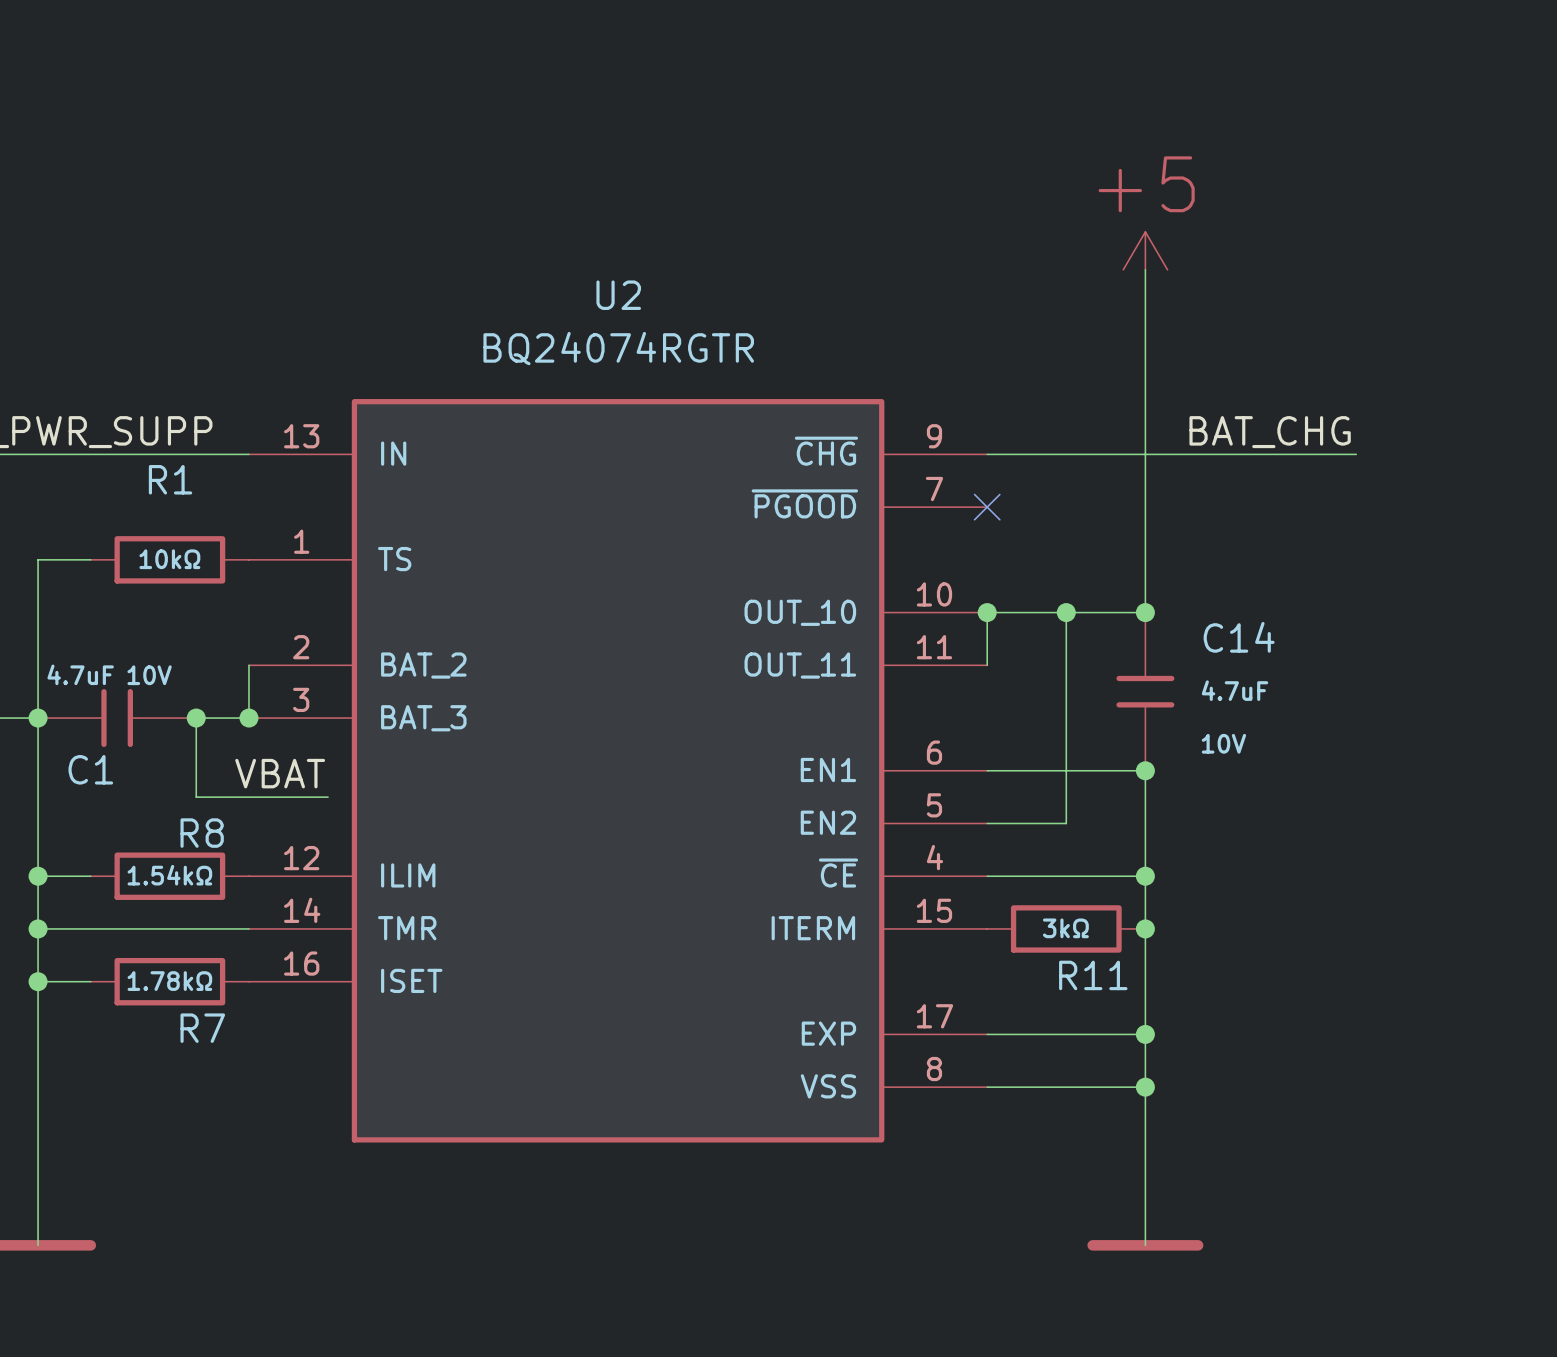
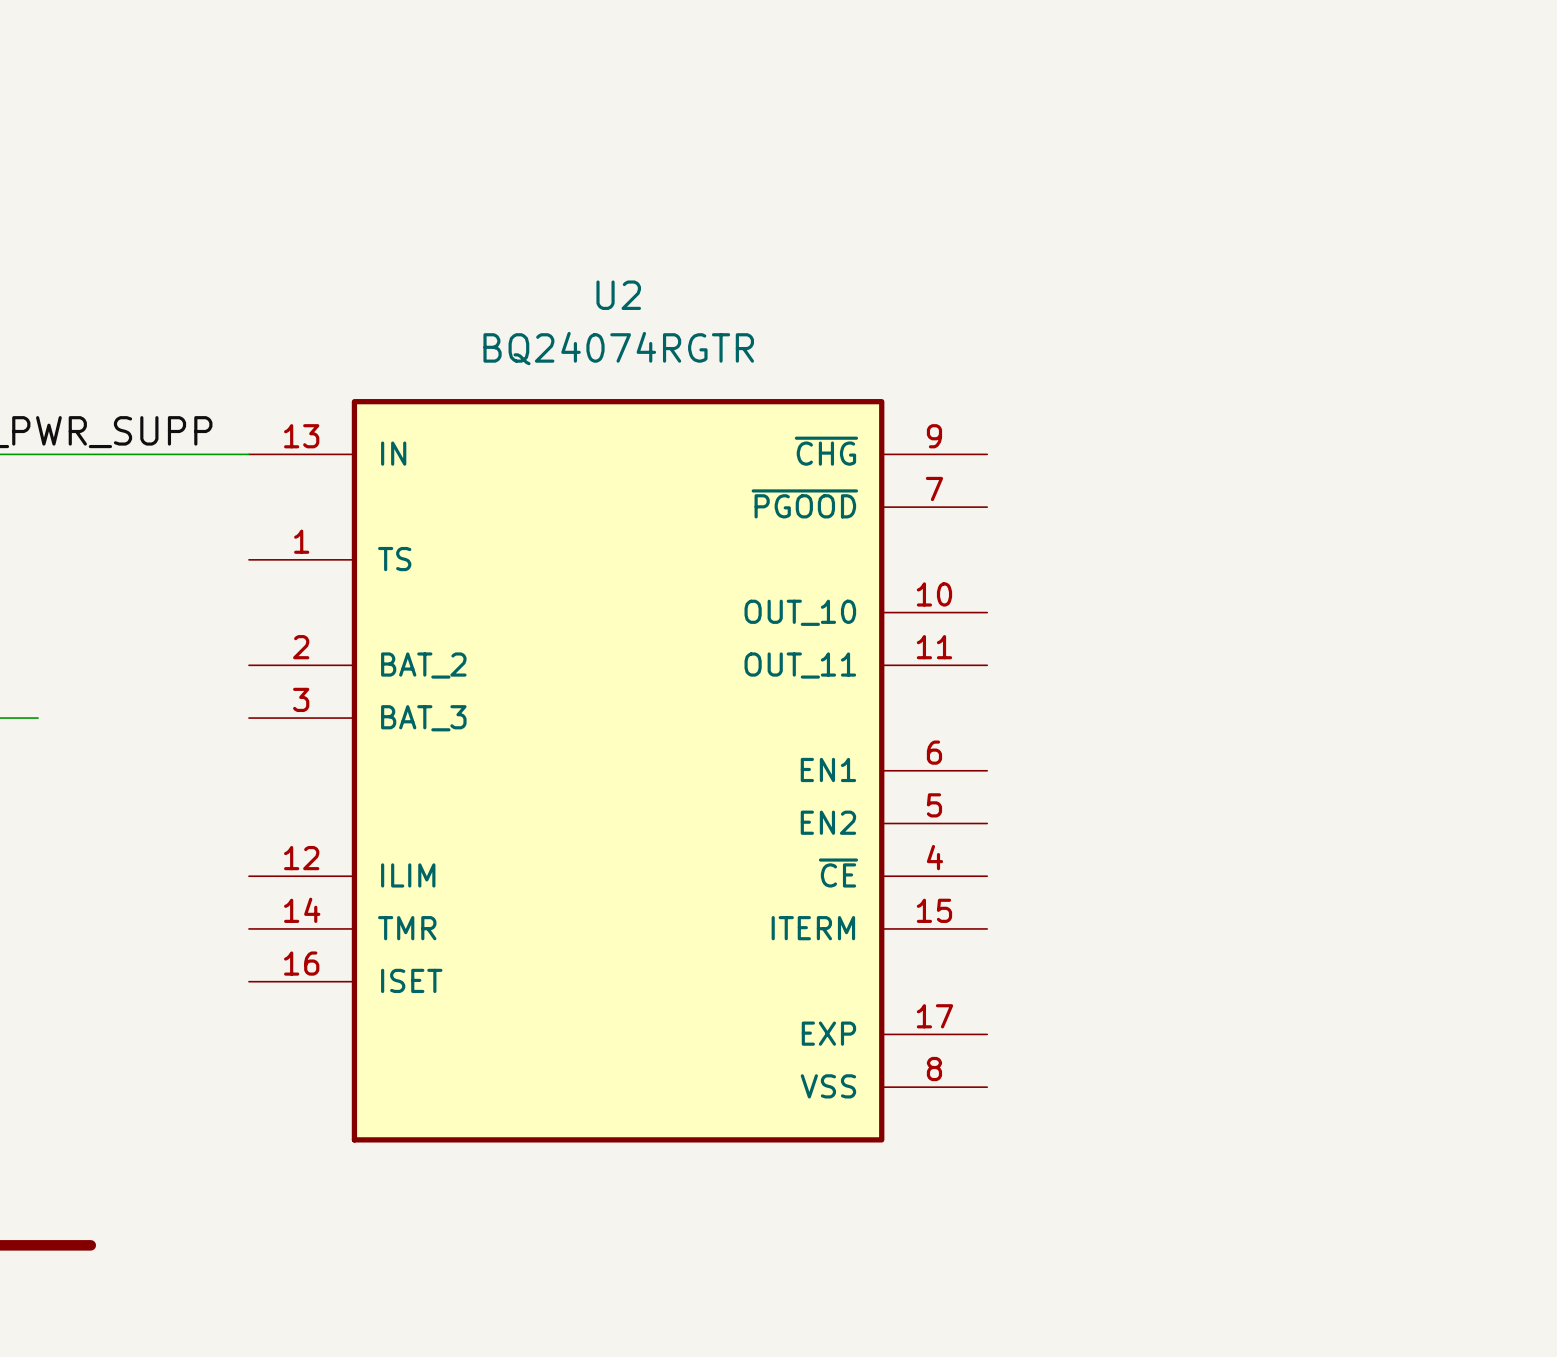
power symbol: (1145, 250) -> none
wire: (1145, 269) (1145, 612) (987, 612) (987, 665) -> none
label: BAT_CHG (1270, 432) -> none
wire: (987, 454) (1356, 454) -> none
no-connect mark: (987, 507) -> none
wire: (90, 559) (38, 559) (38, 1245) -> none
R1: 10kΩ (169, 559) -> none
junction: (987, 612) -> none
wire: (1066, 612) (1066, 823) (987, 823) -> none
junction: (1066, 612) -> none
junction: (1145, 612) -> none
wire: (248, 665) (248, 718) (196, 718) (196, 797) (328, 797) -> none
C14: 4.7uF (1145, 691) -> none
junction: (38, 718) -> none
C1: 4.7uF (117, 718) -> none
junction: (196, 718) -> none
junction: (248, 718) -> none
wire: (987, 770) (1145, 770) (1145, 1245) -> none
junction: (1145, 770) -> none
label: VBAT (280, 773) -> none
wire: (38, 876) (90, 876) -> none
junction: (38, 876) -> none
R8: 1.54kΩ (169, 876) -> none
wire: (987, 876) (1145, 876) -> none
junction: (1145, 876) -> none
wire: (38, 928) (248, 928) -> none
junction: (38, 928) -> none
R11: 3kΩ (1066, 928) -> none
junction: (1145, 928) -> none
wire: (38, 981) (90, 981) -> none
junction: (38, 981) -> none
R7: 1.78kΩ (169, 981) -> none
wire: (987, 1034) (1145, 1034) -> none
junction: (1145, 1034) -> none
wire: (987, 1087) (1145, 1087) -> none
junction: (1145, 1087) -> none
power symbol: (1145, 1245) -> none

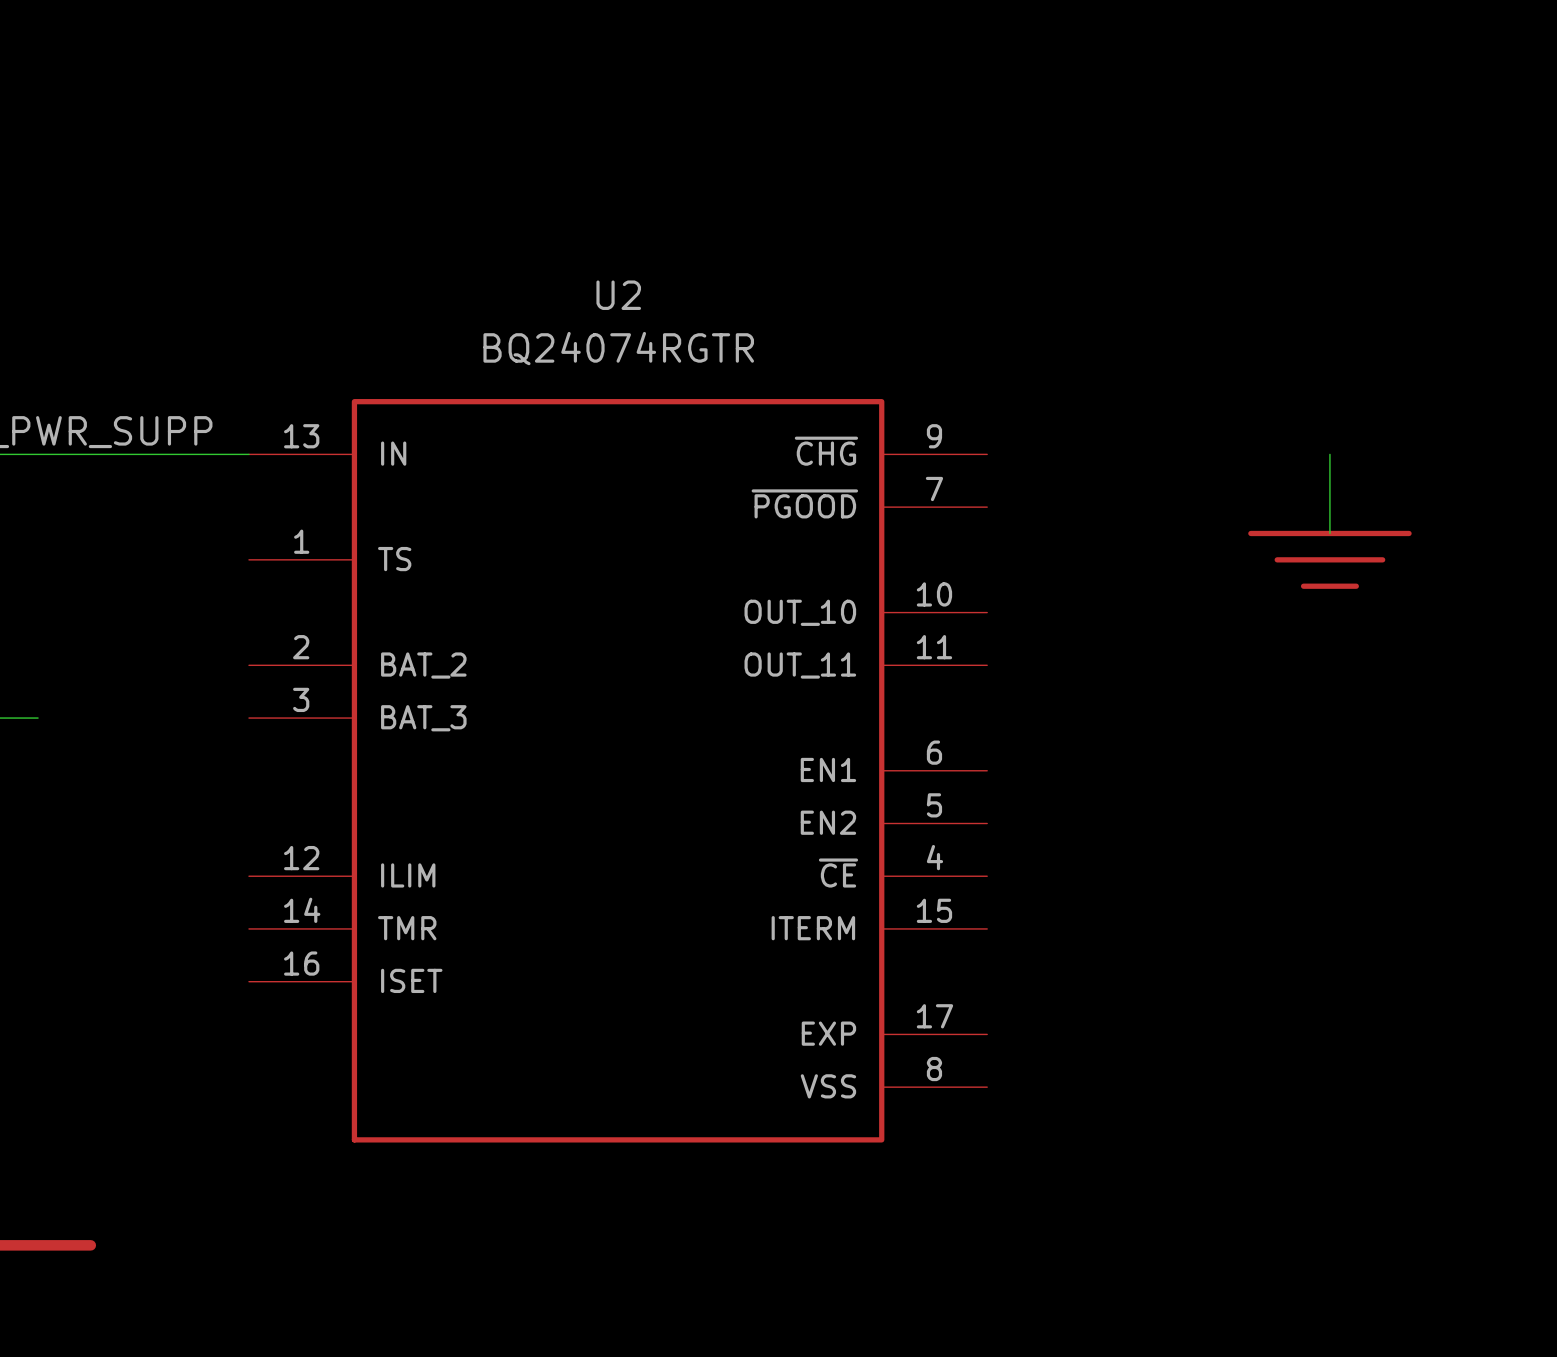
wire: none -> (1329, 454) (1329, 533)
power symbol: none -> (1329, 559)

